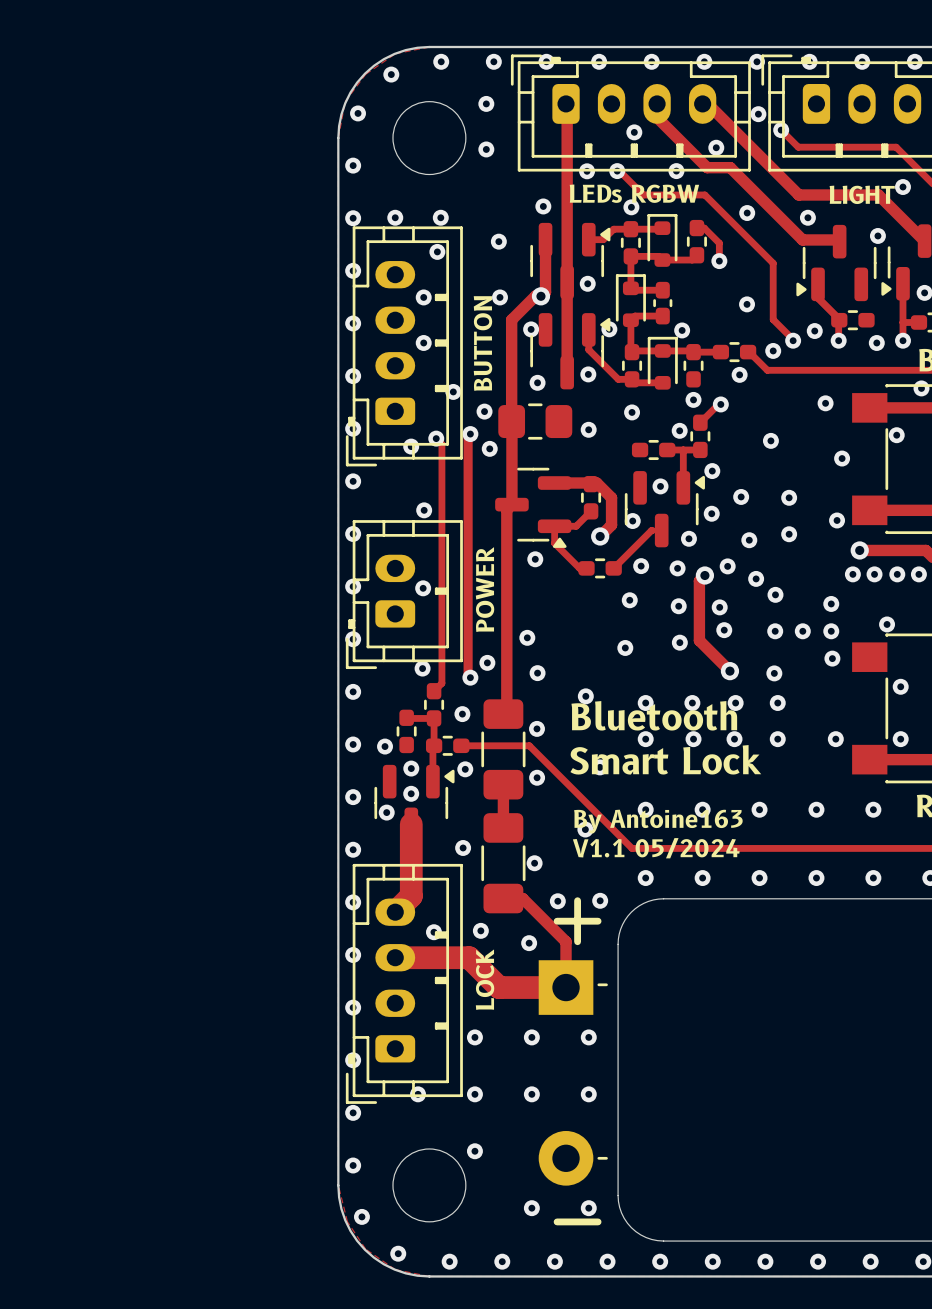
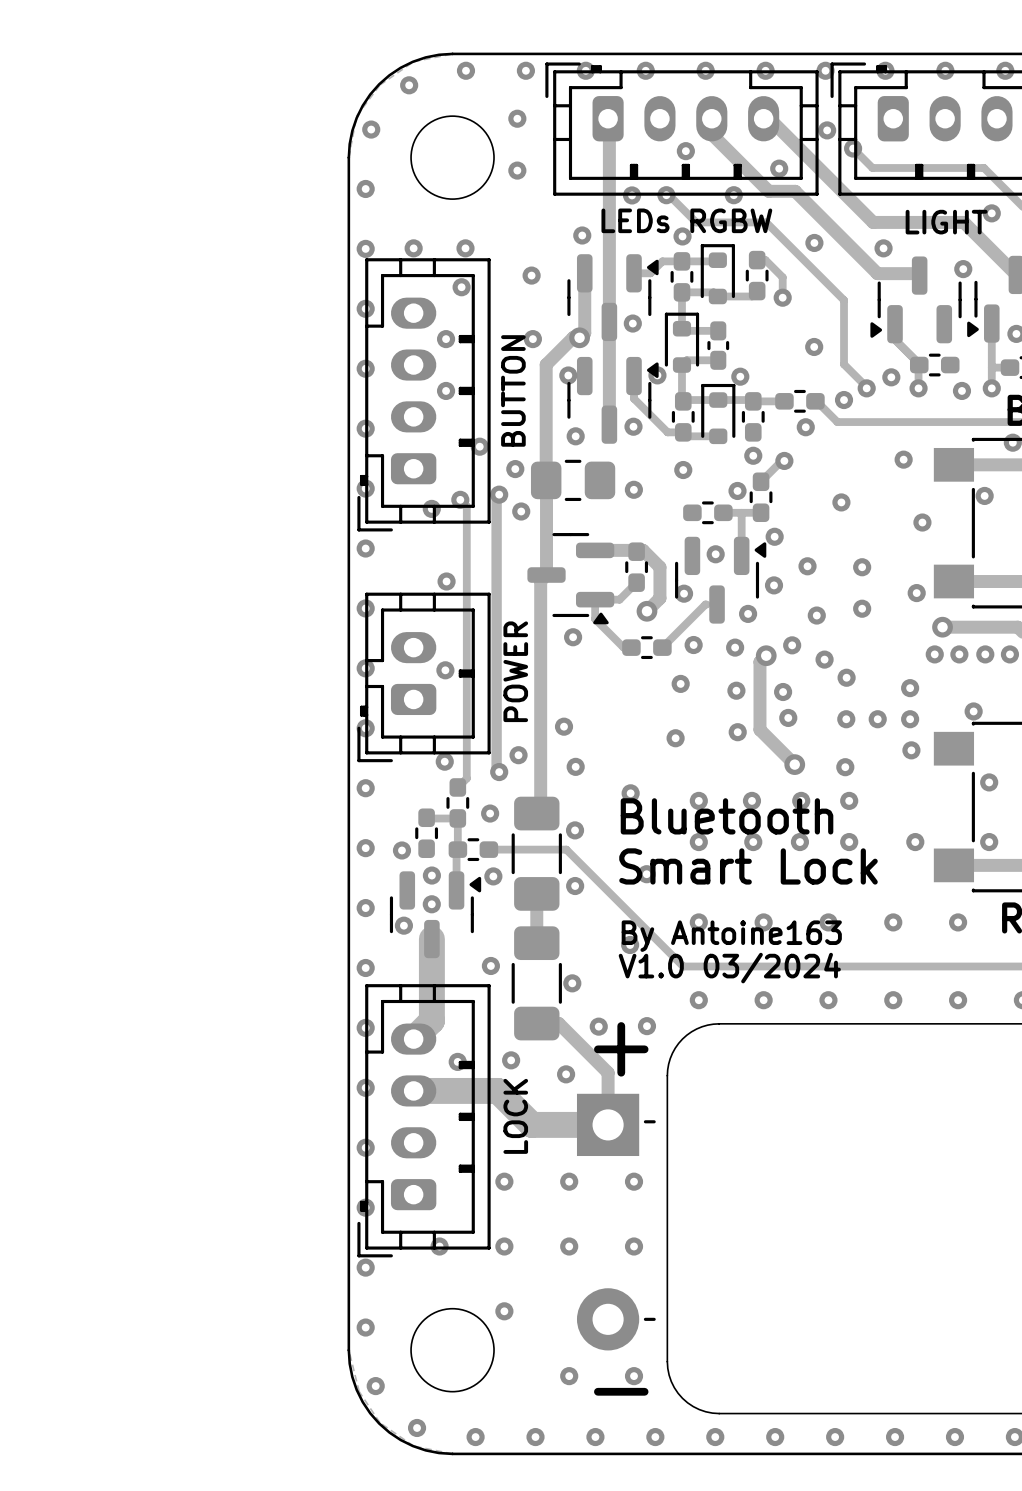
text: V1.1 05/2024 (656, 848) -> V1.0 03/2024 (729, 968)

